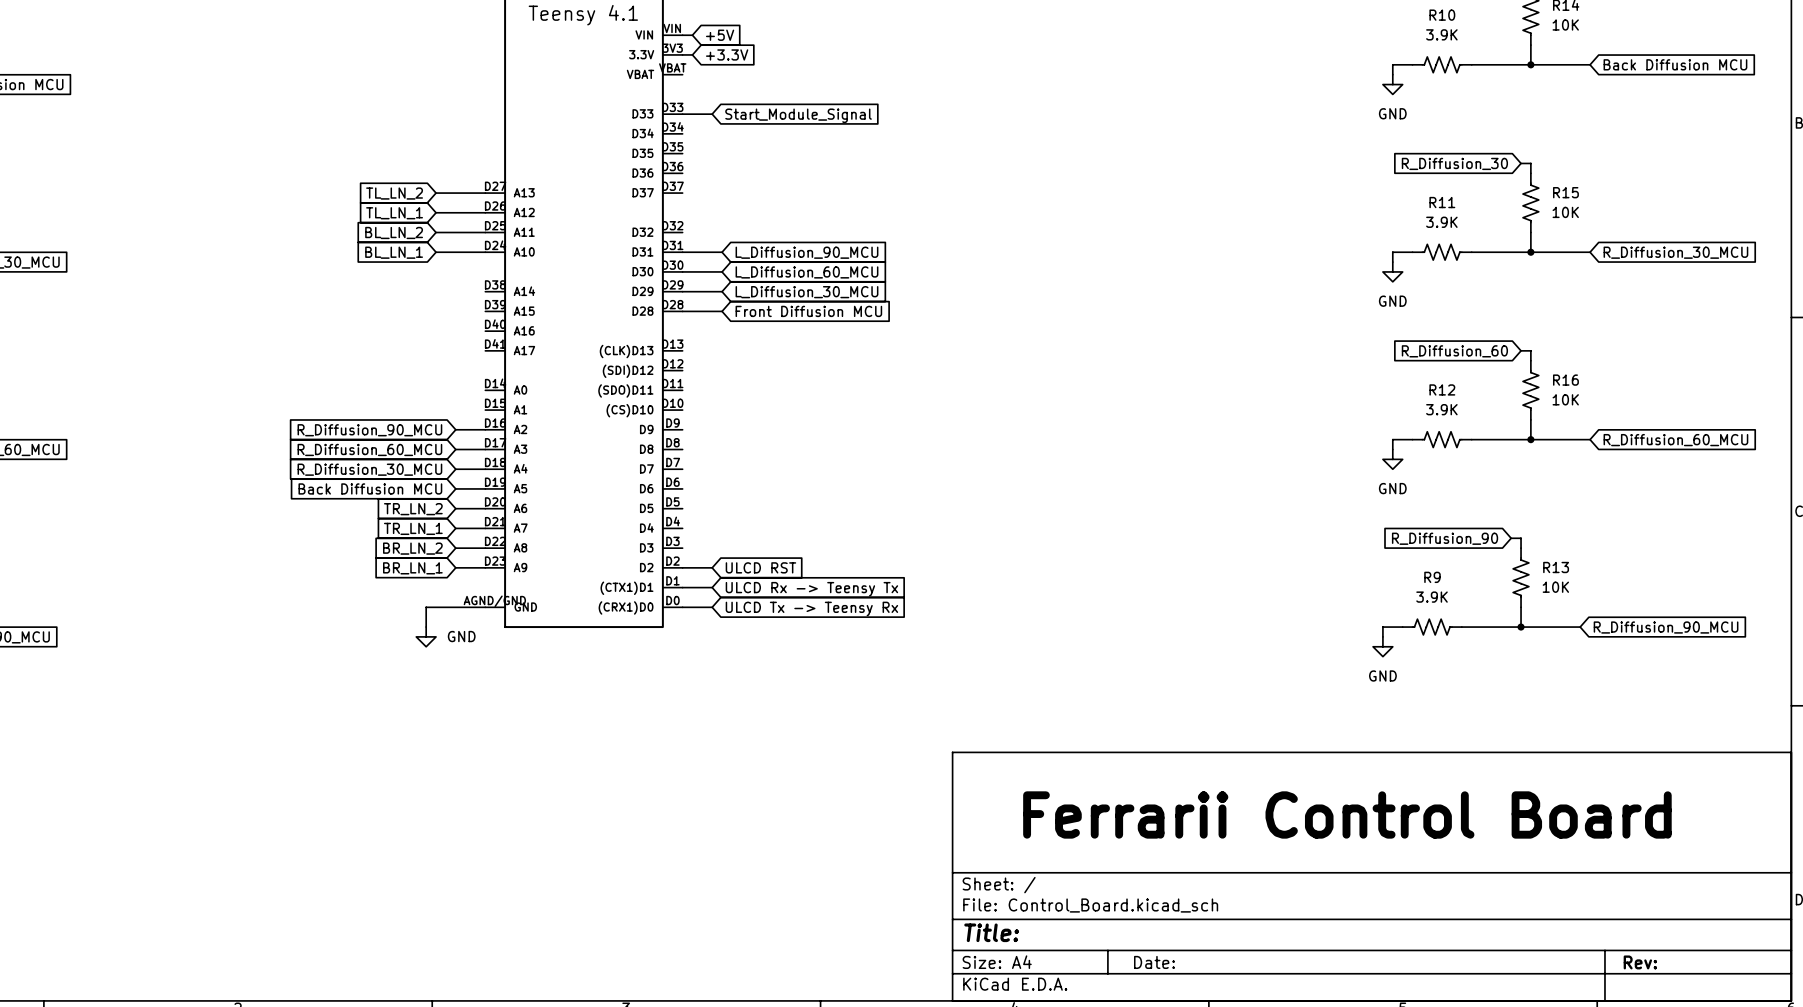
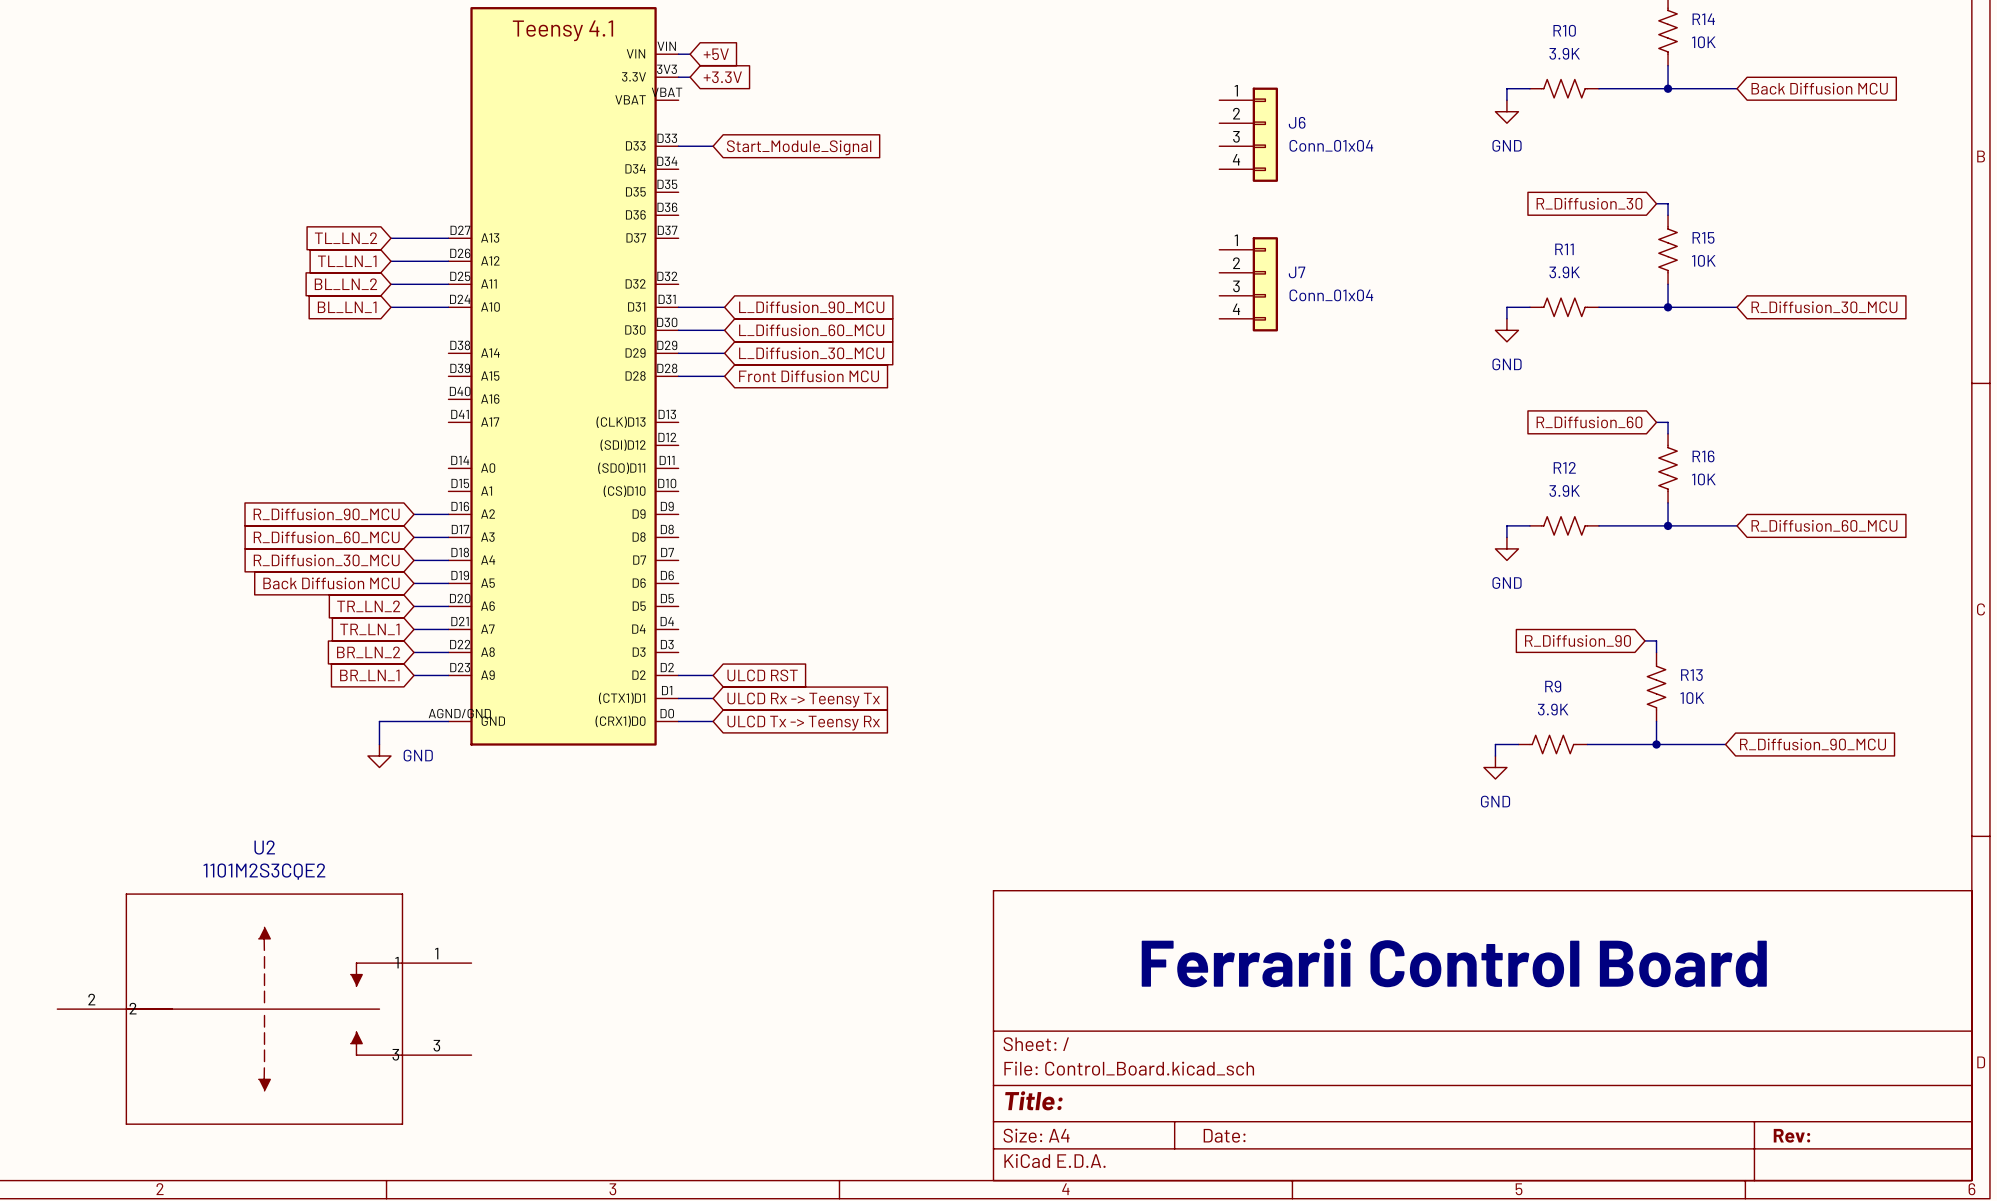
J6: none -> Conn_01x04 (1248, 134)
J7: none -> Conn_01x04 (1248, 284)
U2: none -> 1101M2S3CQE2 (264, 1009)

